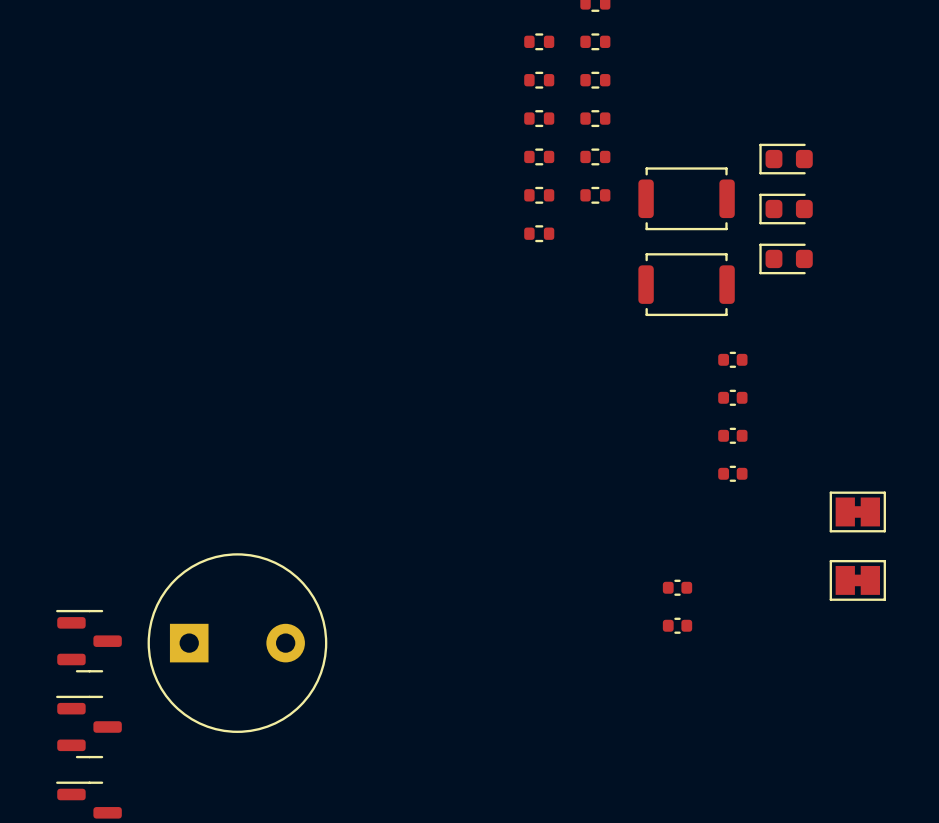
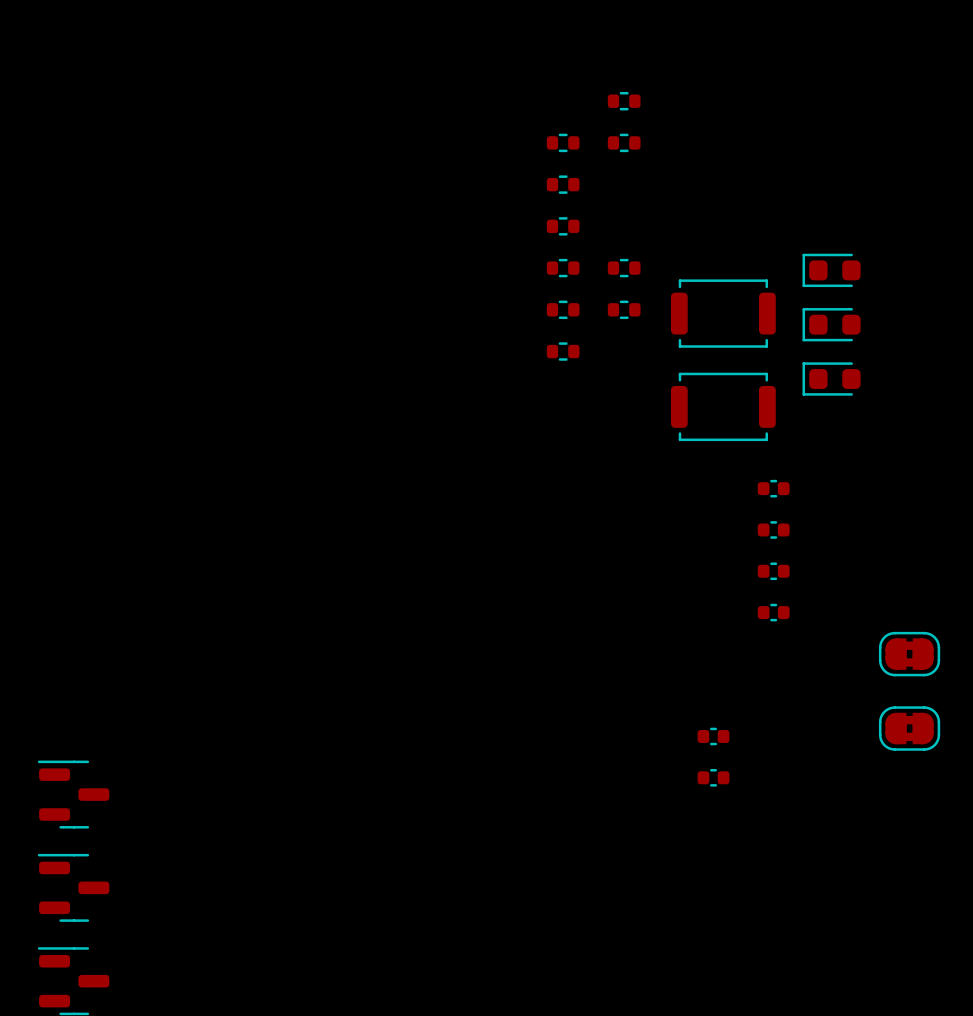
part: (595, 80) -> none
part: (595, 118) -> none
part footprint: [829, 491, 886, 533] -> [878, 631, 941, 677]
part footprint: [829, 559, 886, 601] -> [878, 706, 941, 751]
part: (237, 643) -> none

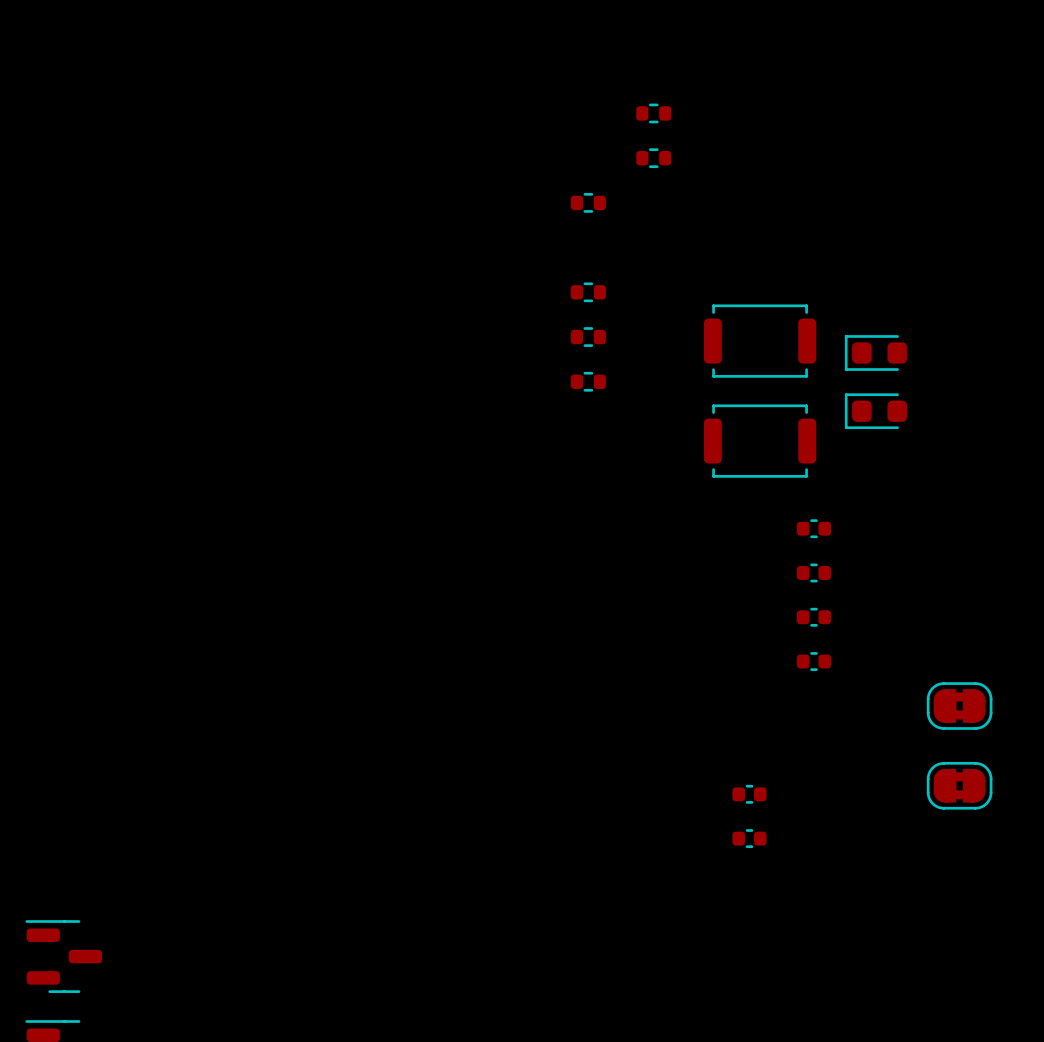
part: (563, 142) -> none
part: (563, 226) -> none
part: (624, 268) -> none
part: (831, 270) -> none
part: (624, 309) -> none
part: (73, 794) -> none

